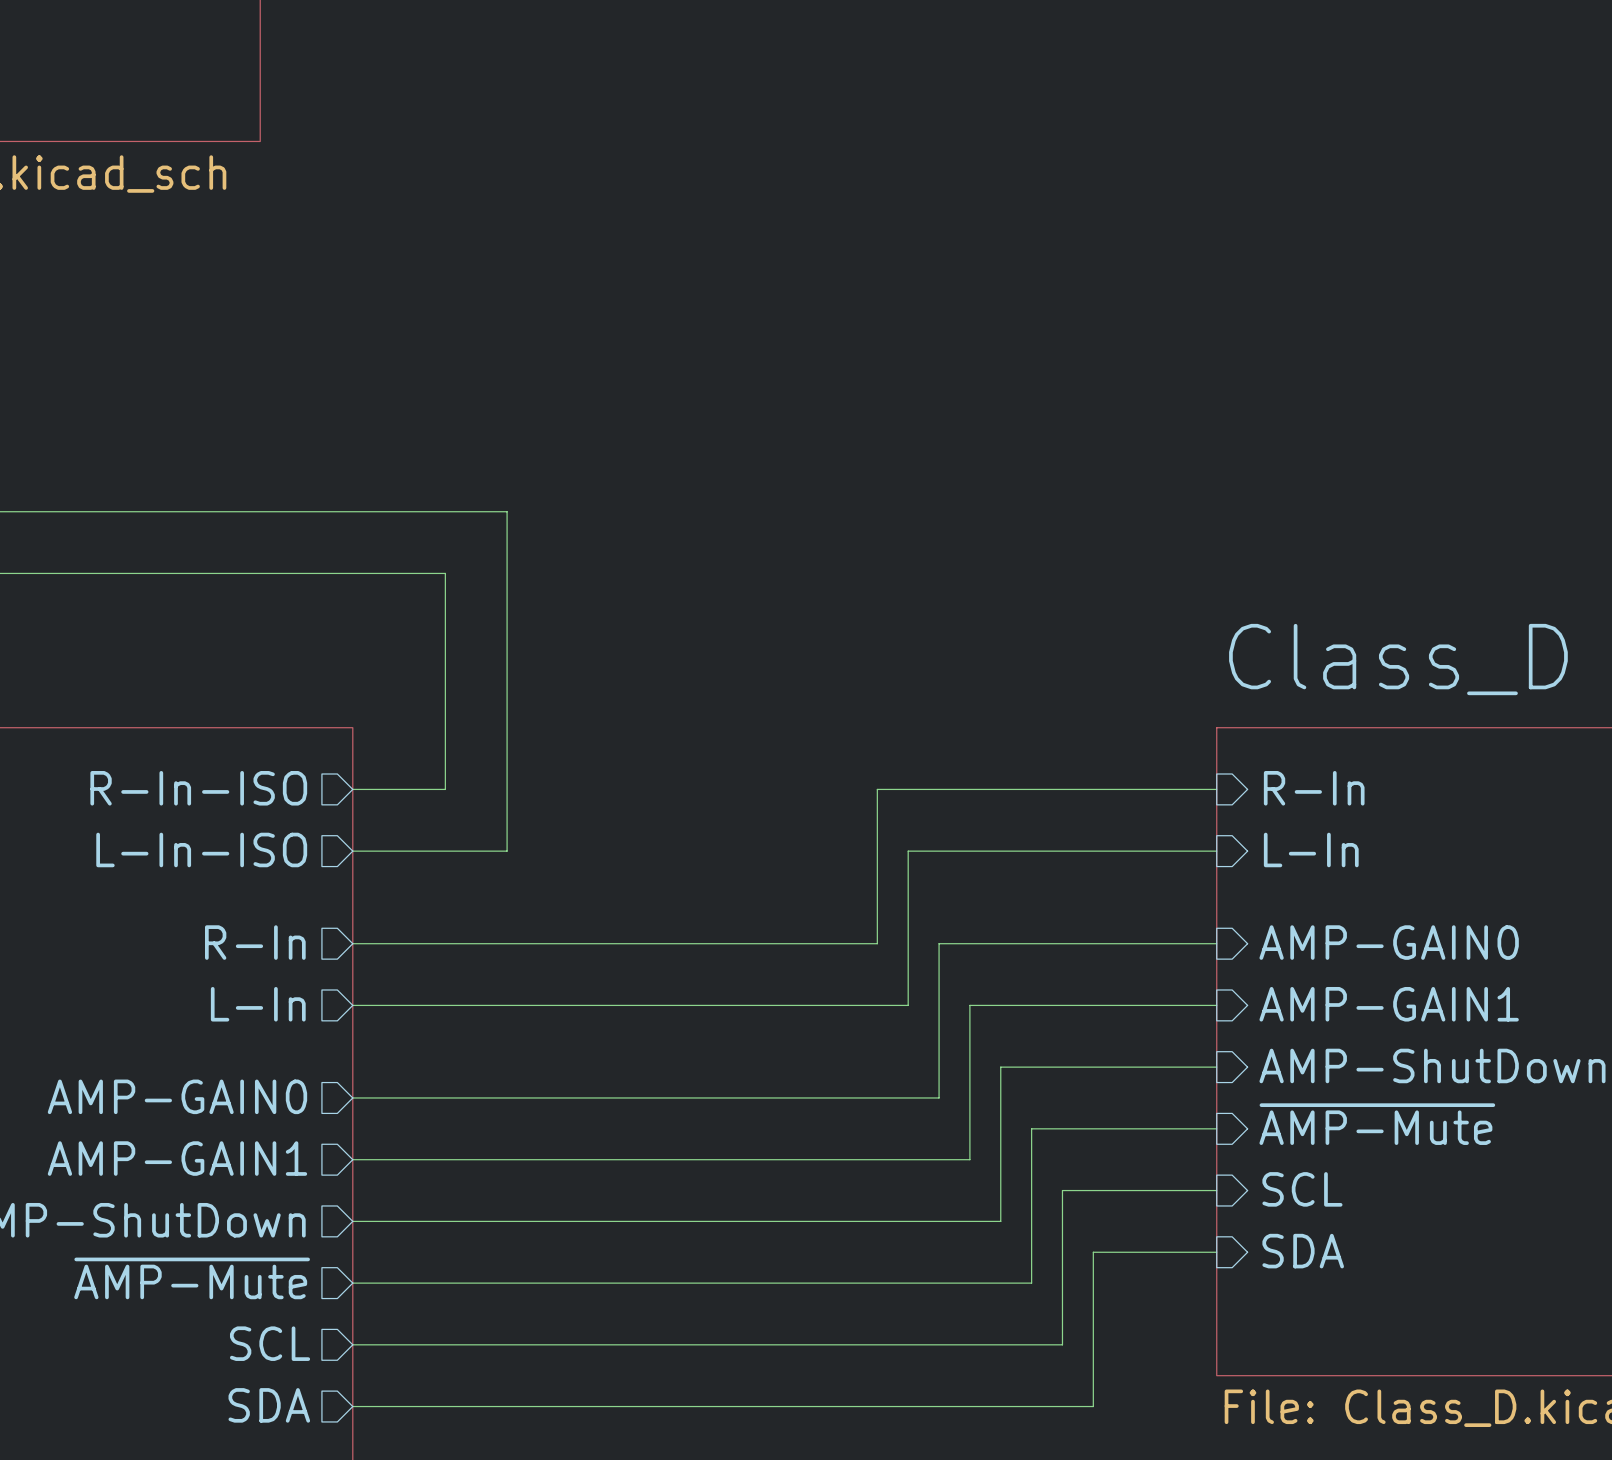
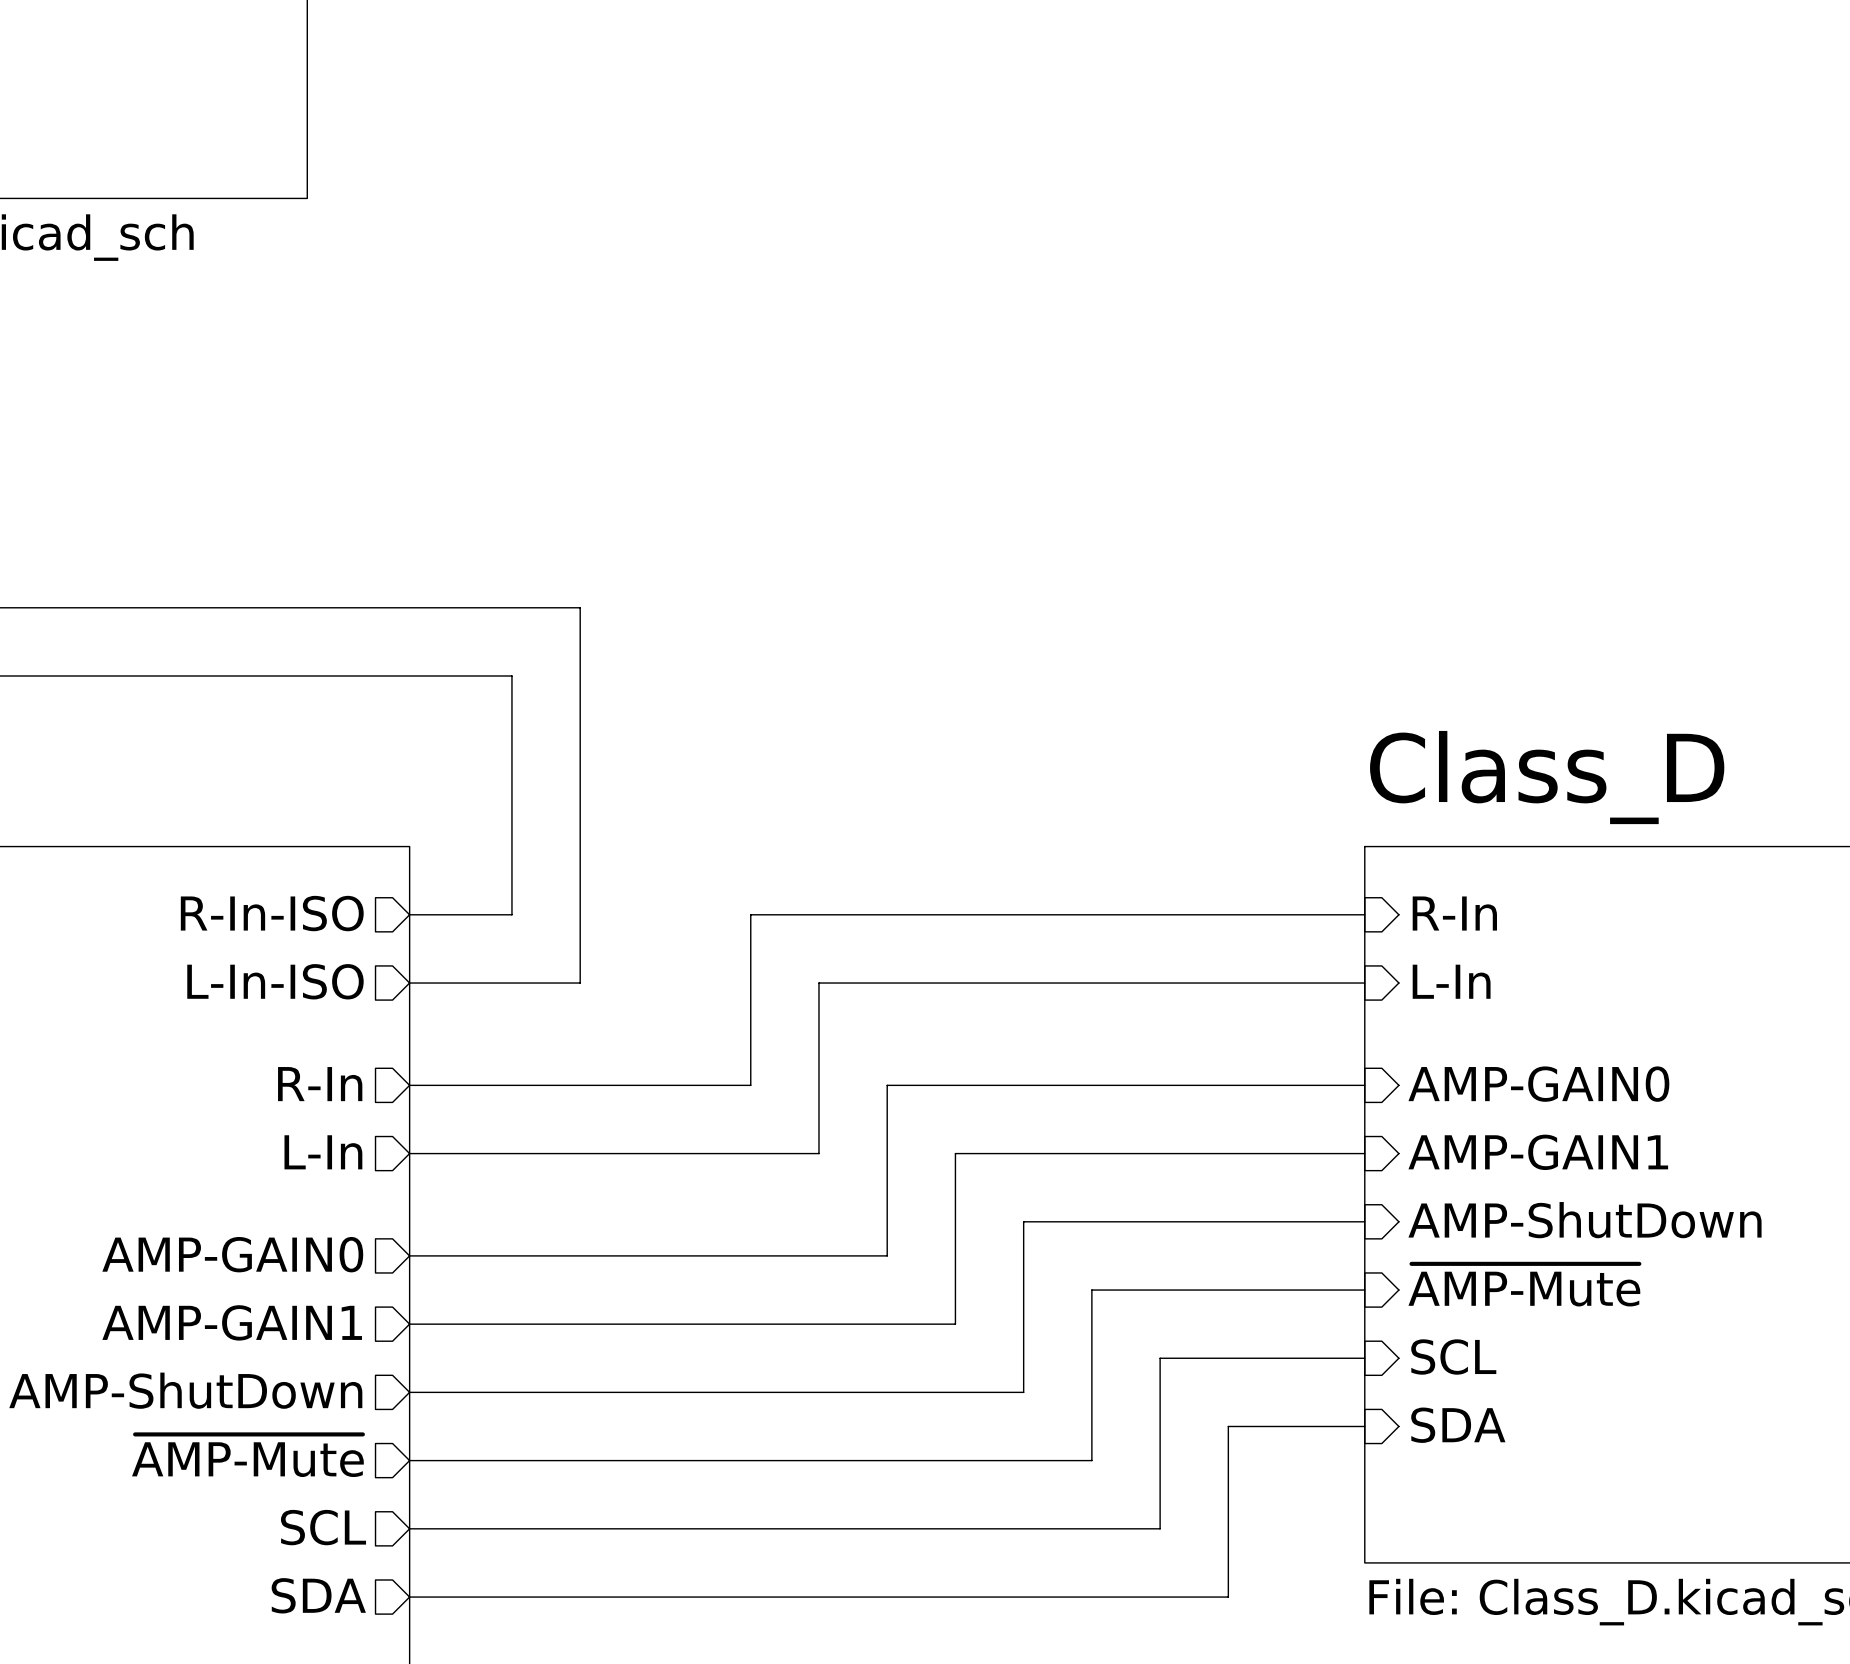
wire: (877, 789) (877, 943) -> (1057, 1085) (989, 1085)
wire: (908, 851) (908, 1005) -> (955, 1153) (955, 1324)
wire: (661, 943) (784, 943) -> (750, 1085) (750, 914) (989, 914)
wire: (939, 943) (939, 1097) (784, 1097) -> (887, 1085) (887, 1255)
wire: (723, 1005) (846, 1005) -> (818, 1153) (818, 983) (1023, 983)
wire: (969, 1005) (969, 1128) -> (1091, 1153) (1023, 1153)
wire: (1000, 1067) (1000, 1221) (908, 1221) -> (1126, 1221) (1023, 1221) (1023, 1392)
wire: none -> (1091, 1290) (1160, 1290)
wire: (1031, 1128) (1031, 1190) -> (1194, 1358) (1160, 1358)
wire: (846, 1159) (969, 1159) -> (1091, 1460) (1091, 1324)
wire: (1062, 1190) (1062, 1344) (1031, 1344) -> none
wire: (969, 1283) (1031, 1283) -> (1160, 1528) (1160, 1460)

